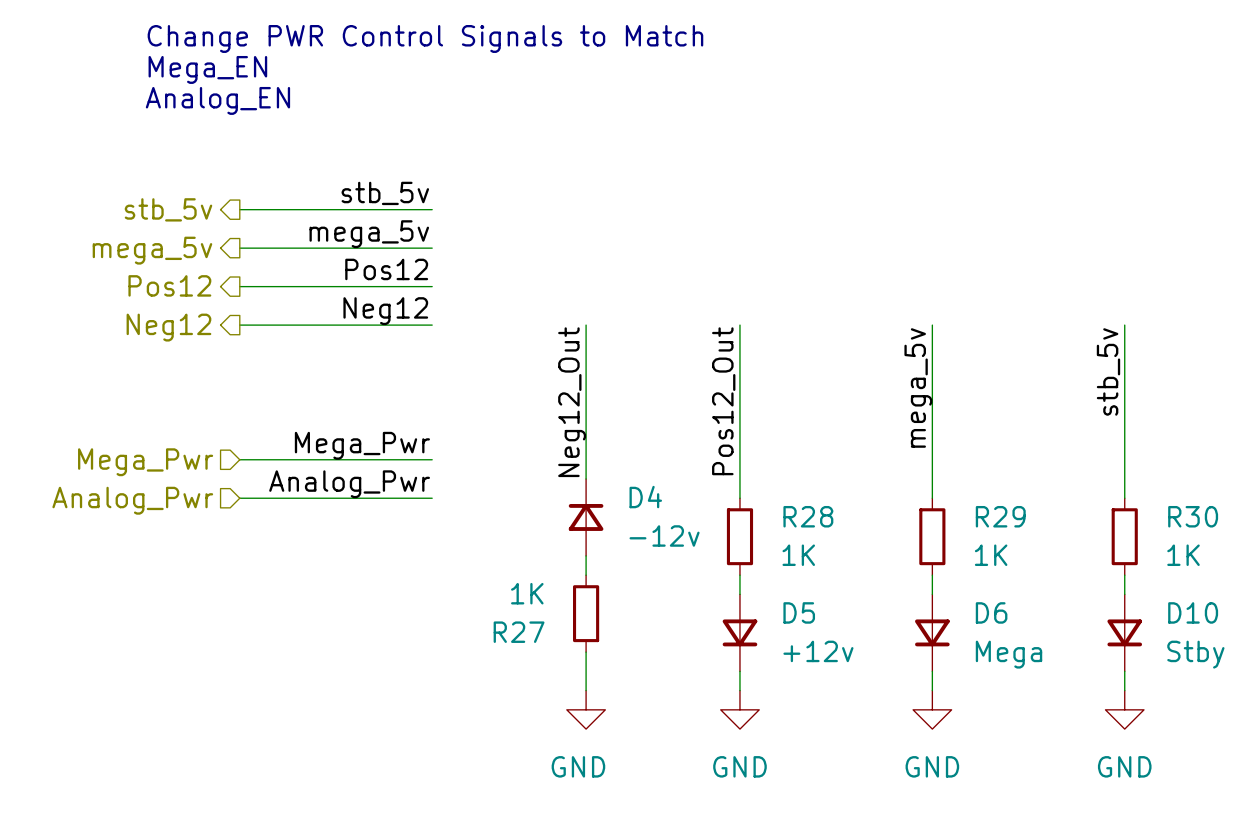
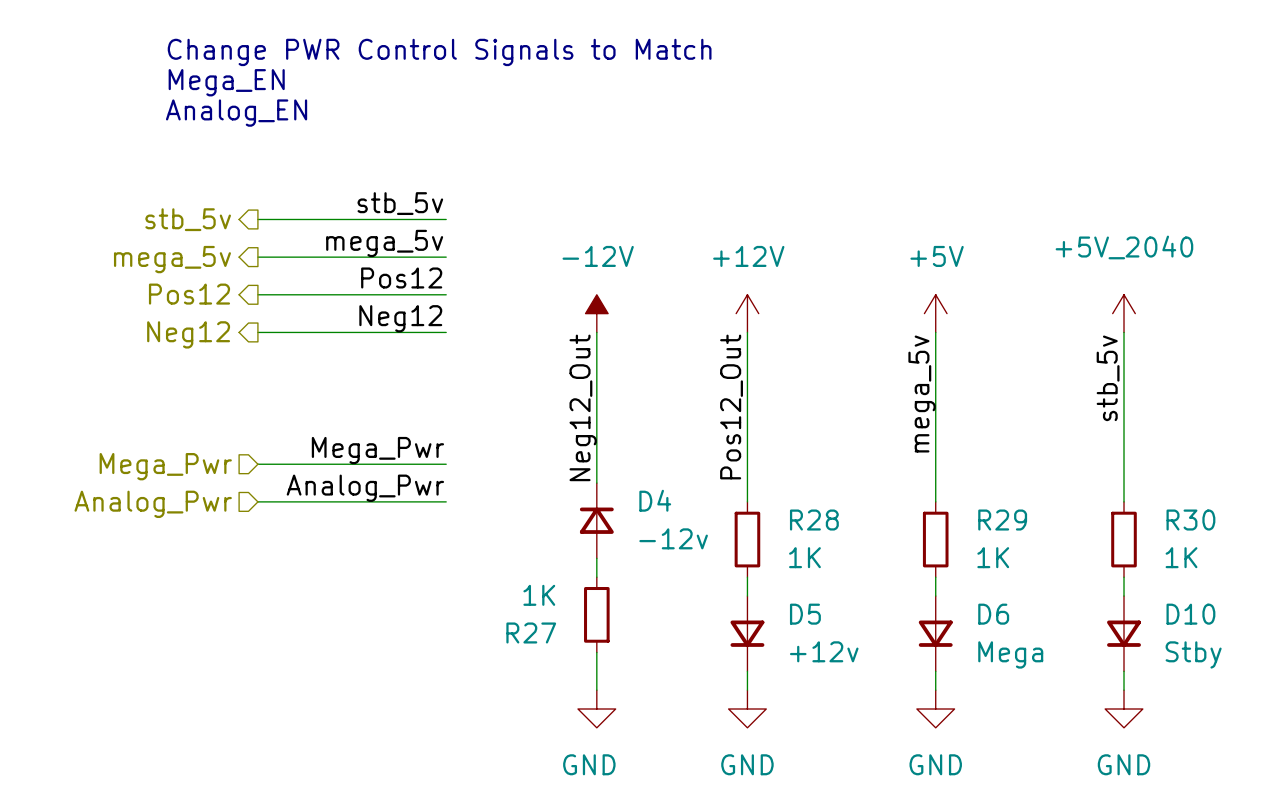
power symbol: none -> -12V (596, 313)
power symbol: none -> +12V (747, 313)
power symbol: none -> +5V (935, 313)
power symbol: none -> +5V_2040 (1124, 313)

